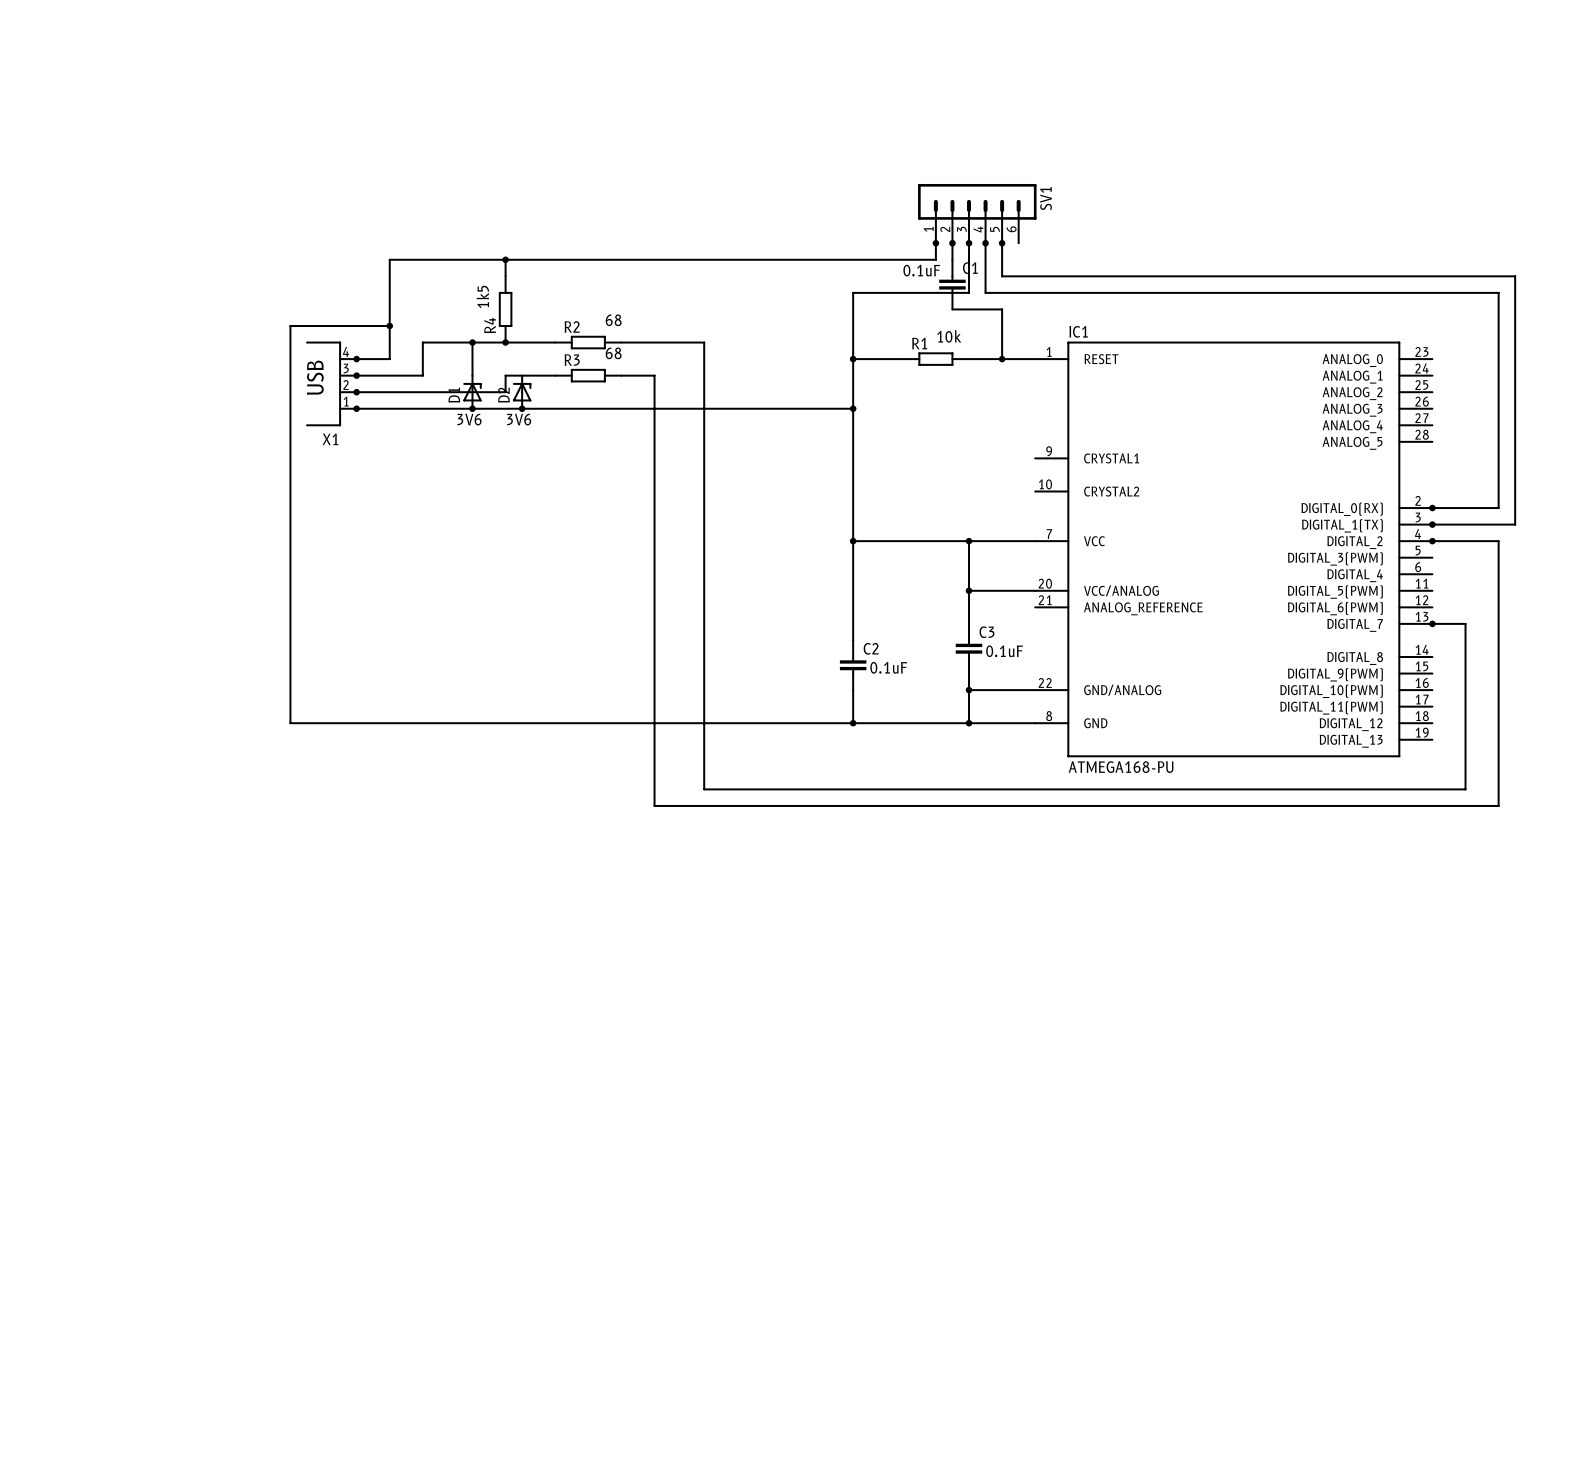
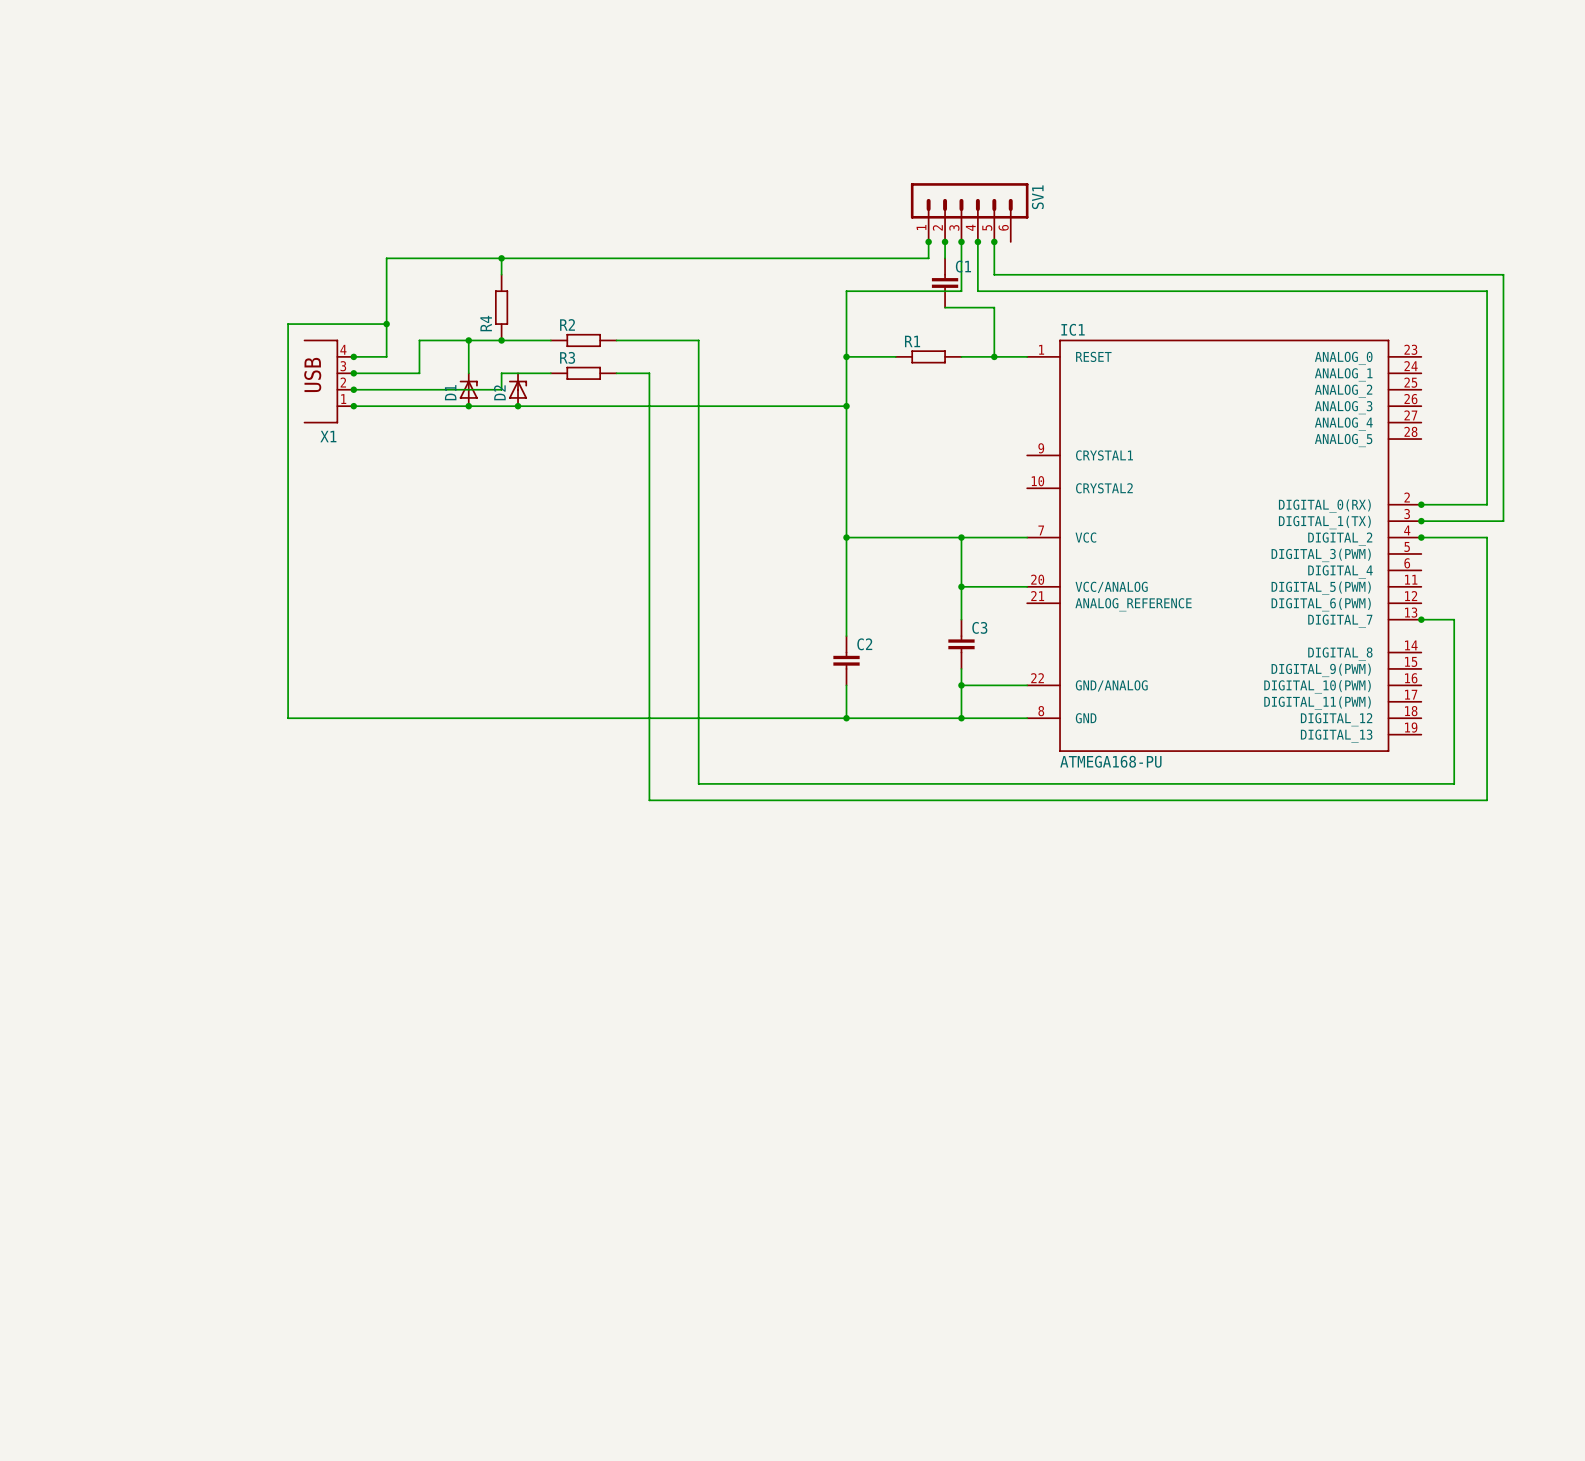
text: 0.1uF (921, 270) -> none
text: 1k5 (482, 296) -> none
text: 68 (613, 320) -> none
text: 10k (949, 336) -> none
text: 68 (613, 353) -> none
text: 3V6 (469, 419) -> none
text: 3V6 (519, 419) -> none
text: 0.1uF (1004, 651) -> none
text: 0.1uF (888, 667) -> none

